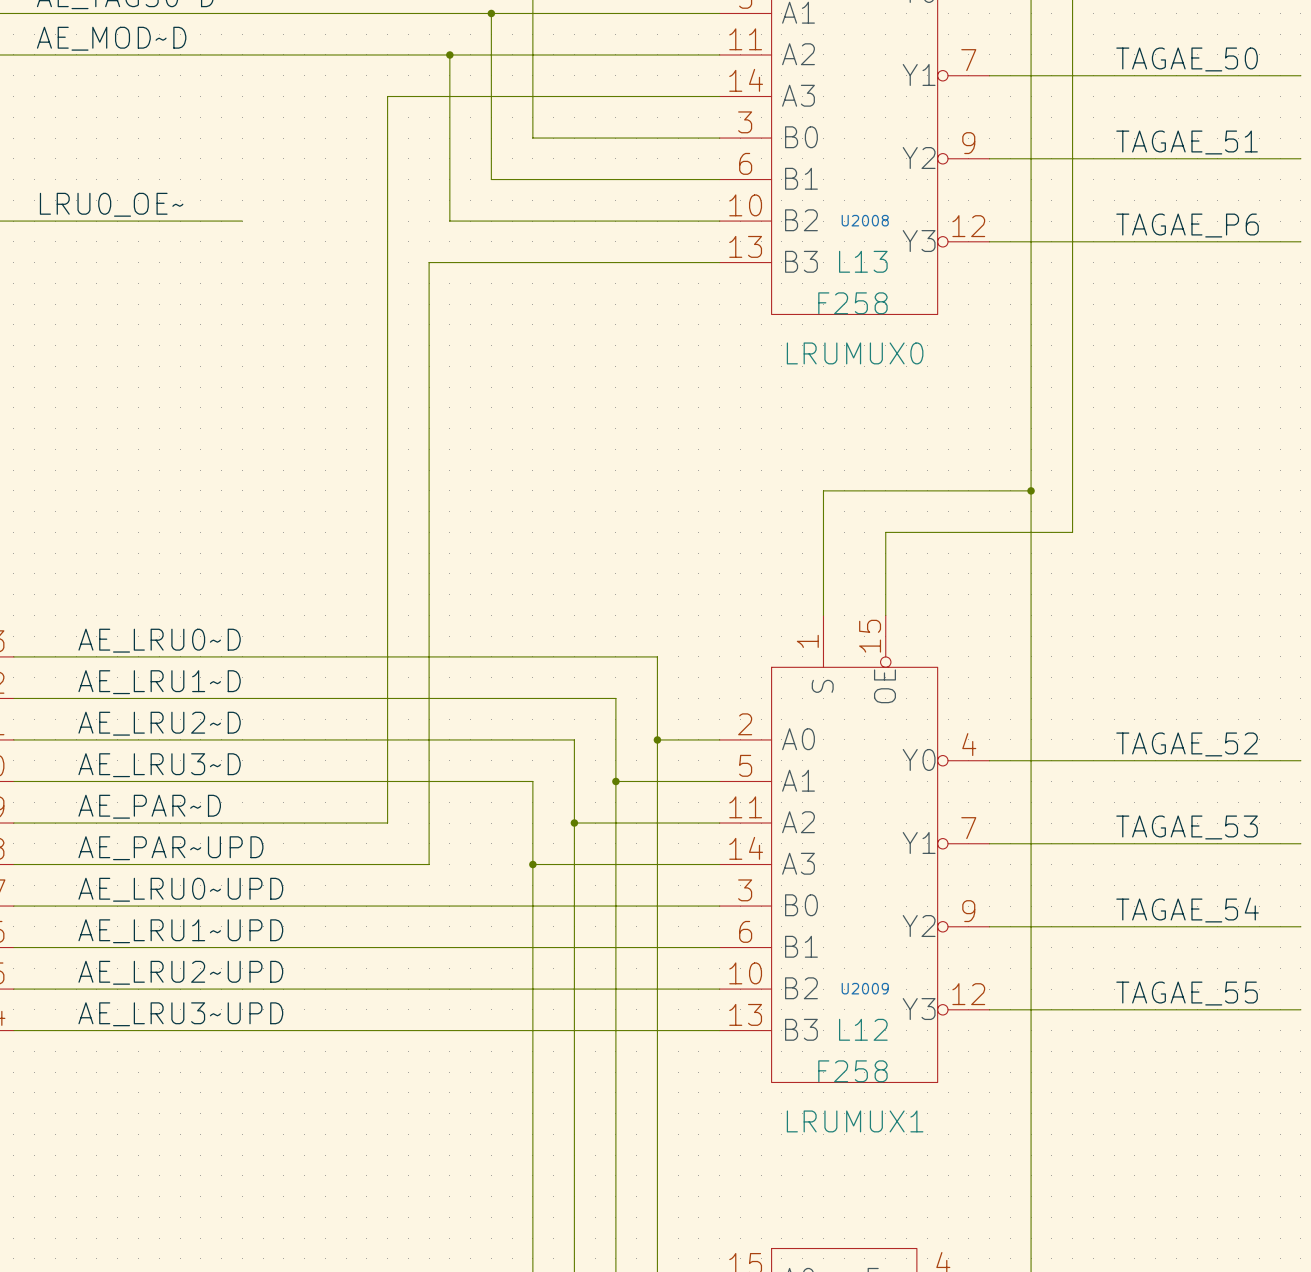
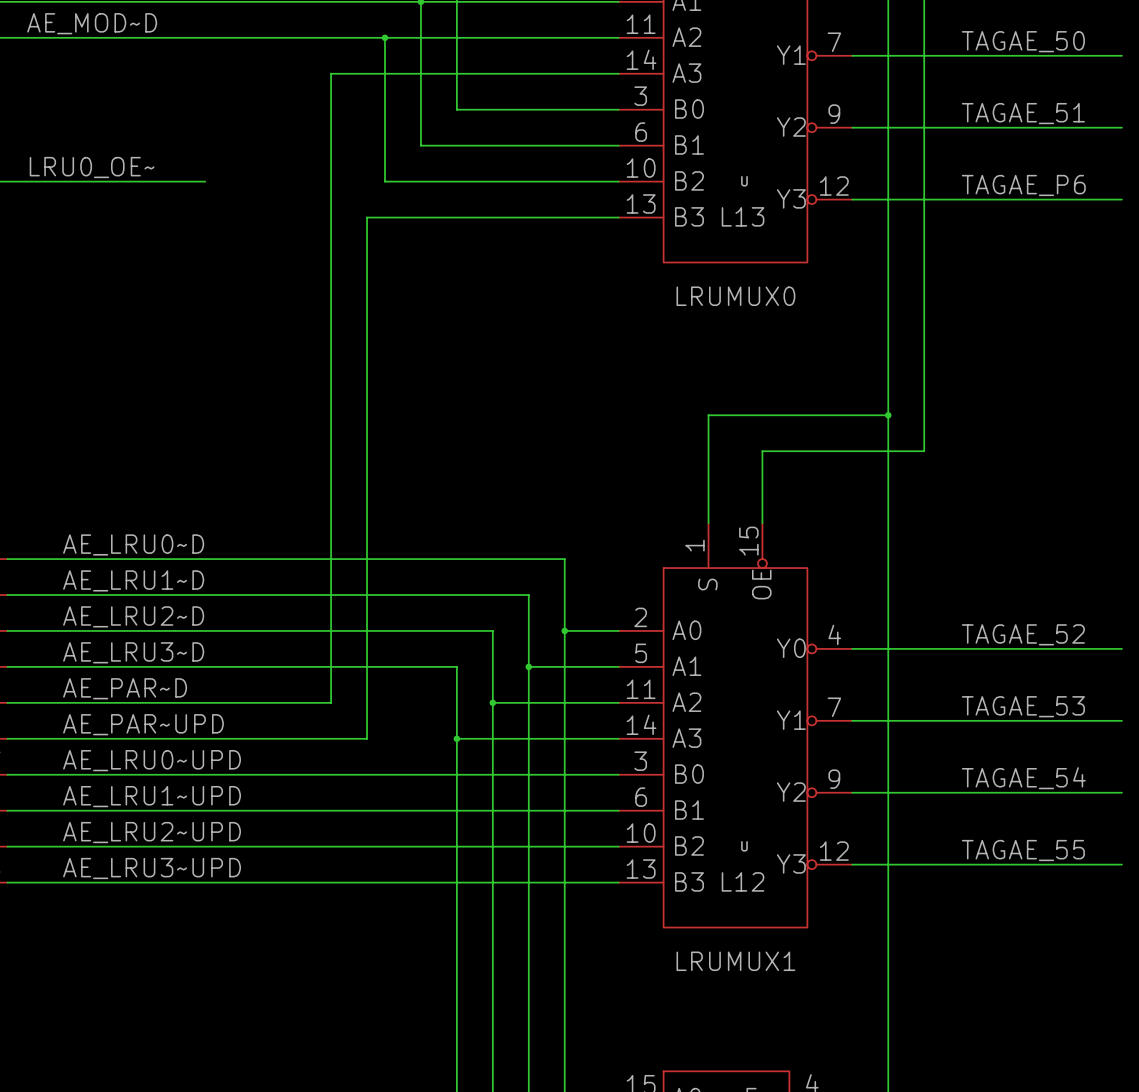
U2008 name: U2008 (865, 220) -> U (744, 181)
U2008 value: F258 (852, 303) -> none
U2009 name: U2009 (865, 988) -> U (744, 846)
U2009 value: F258 (852, 1071) -> none

